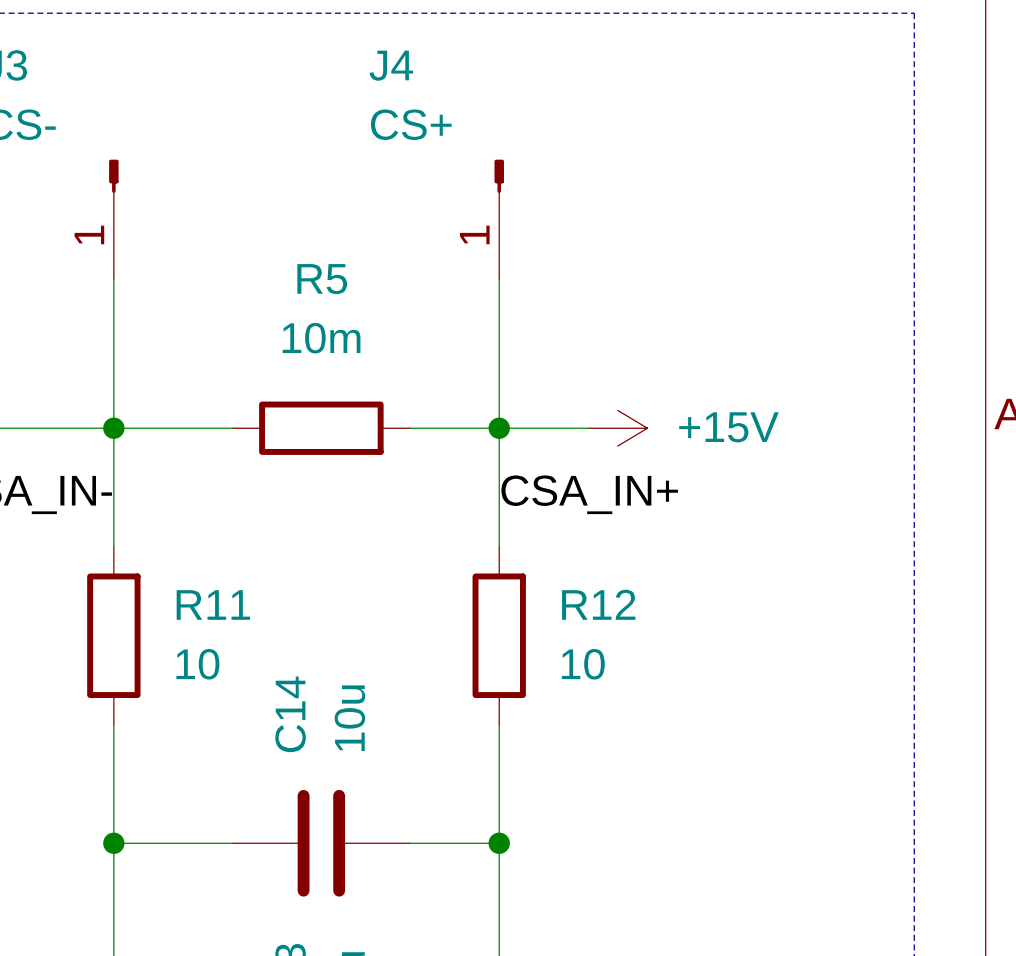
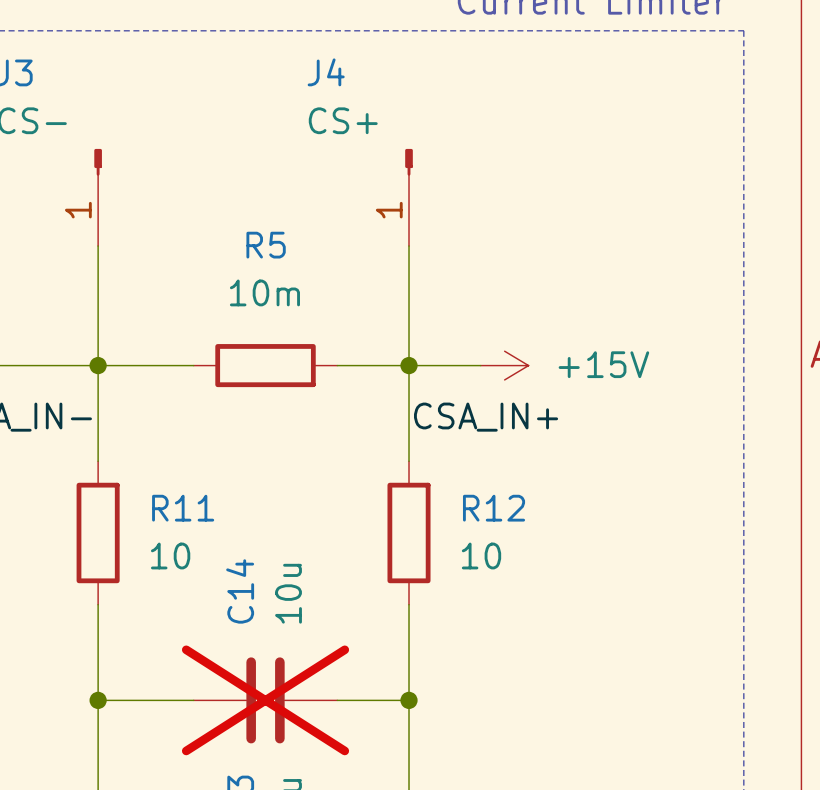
C14 do-not-place cross: none -> (265, 700)

